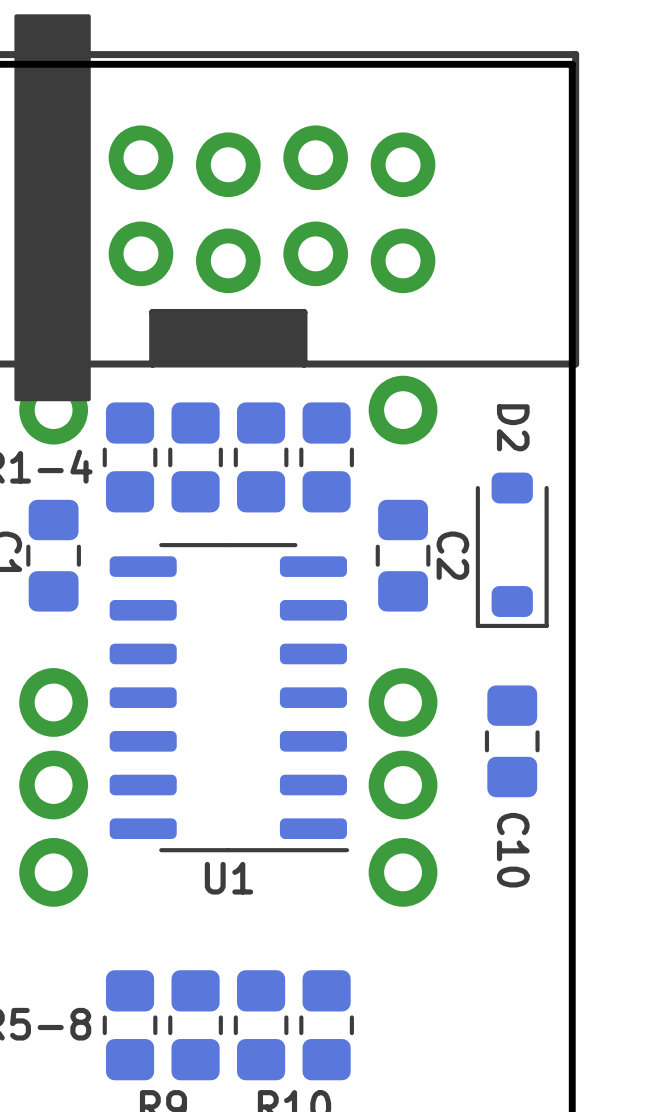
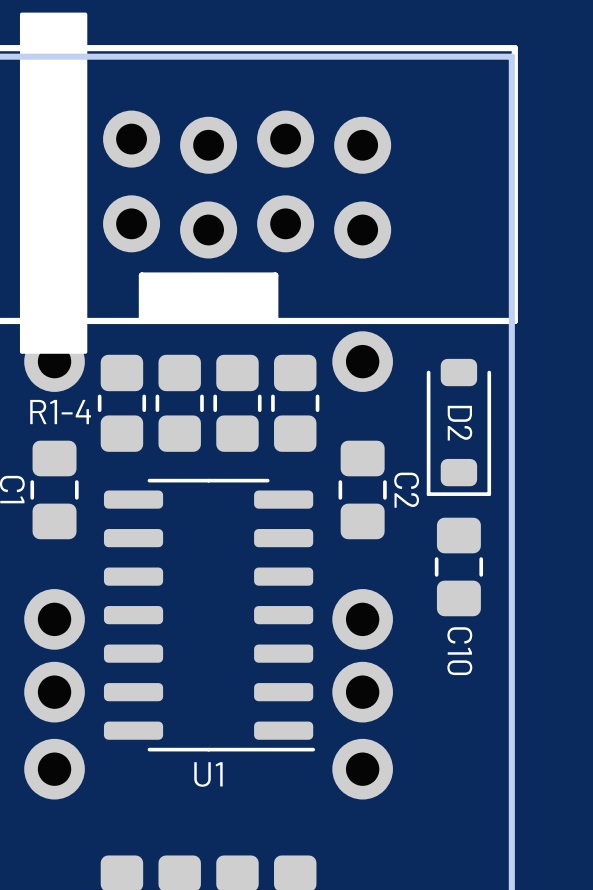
D2 name position: D2 (513, 427) -> D2 (459, 423)
D2 position: (512, 550) -> (458, 427)
C10 position: (512, 741) -> (458, 566)

